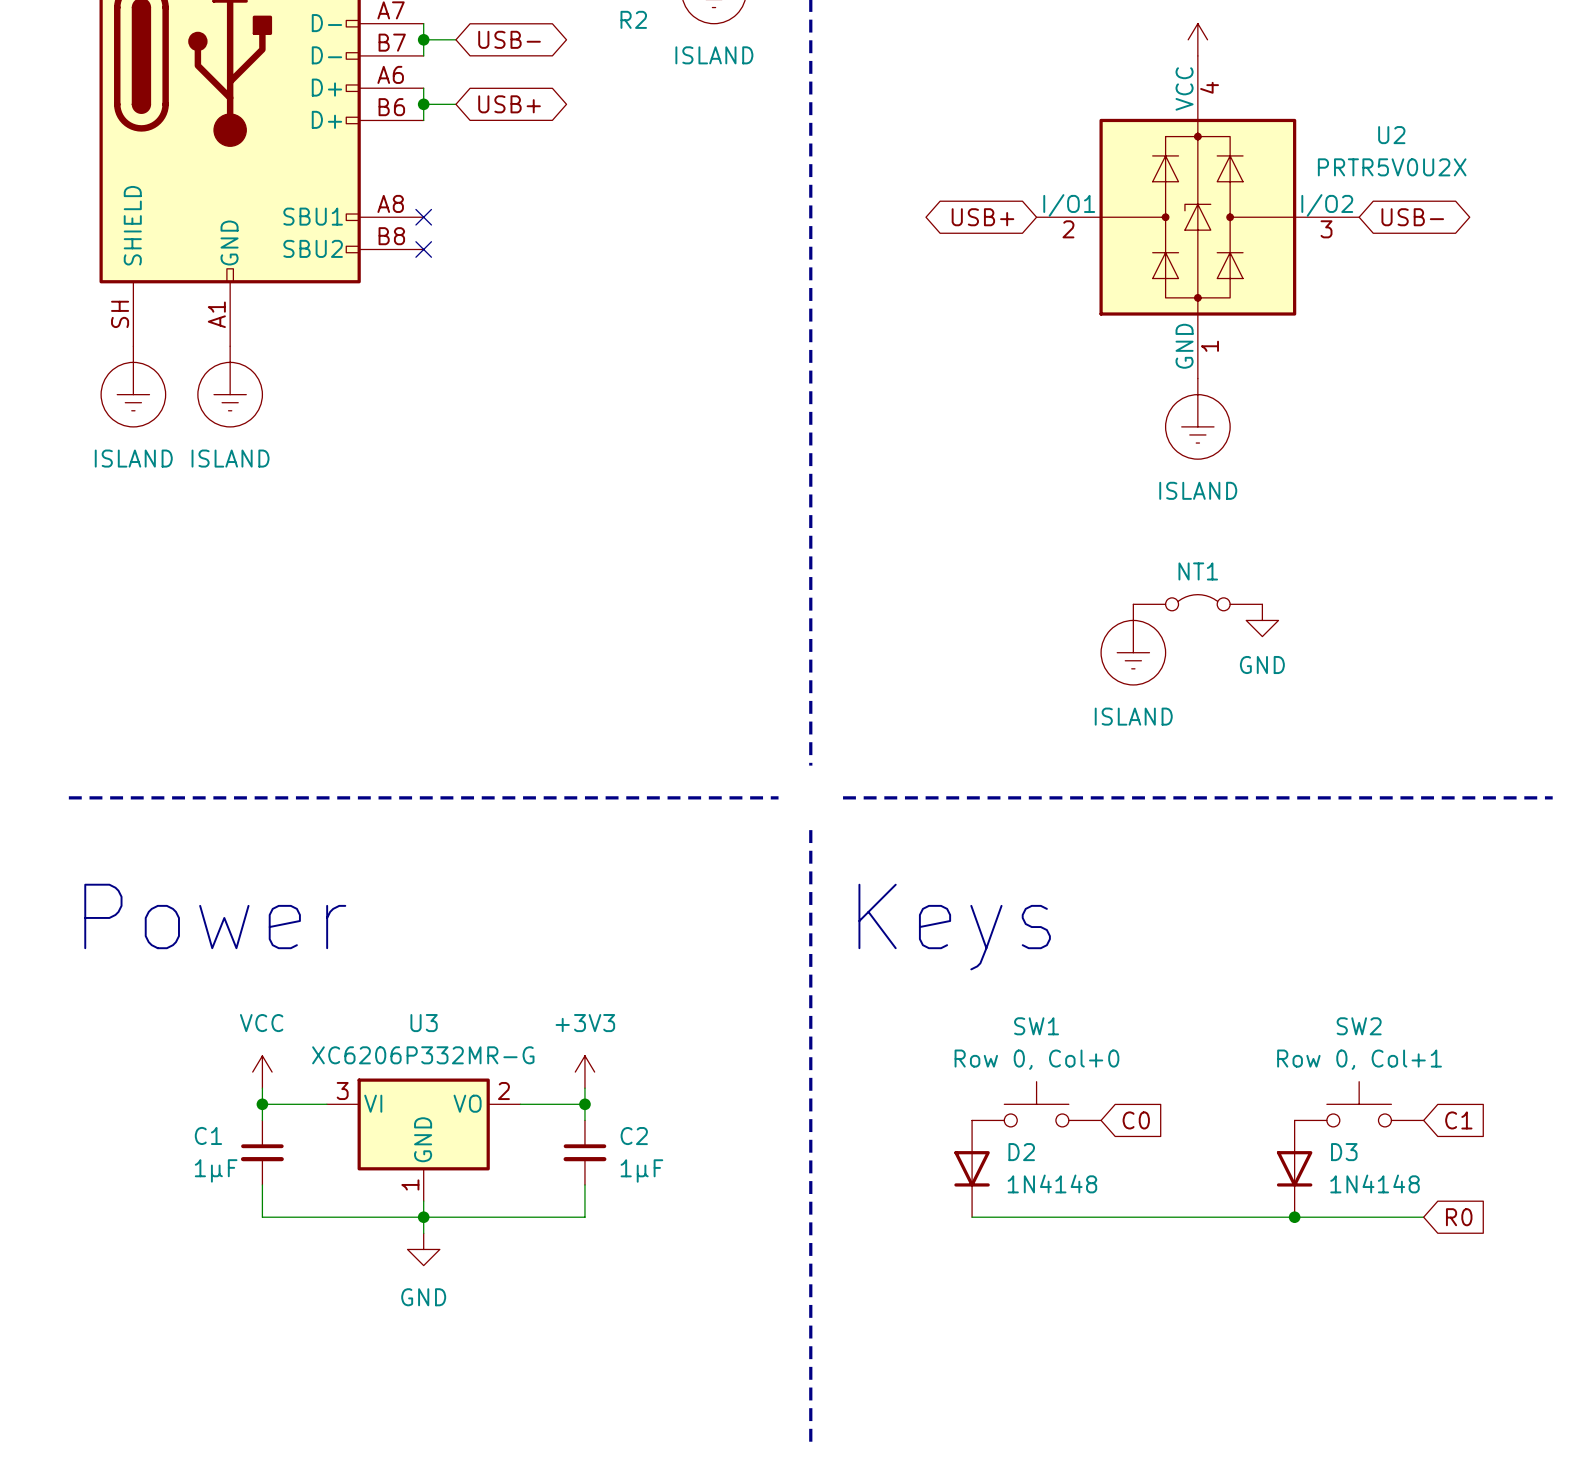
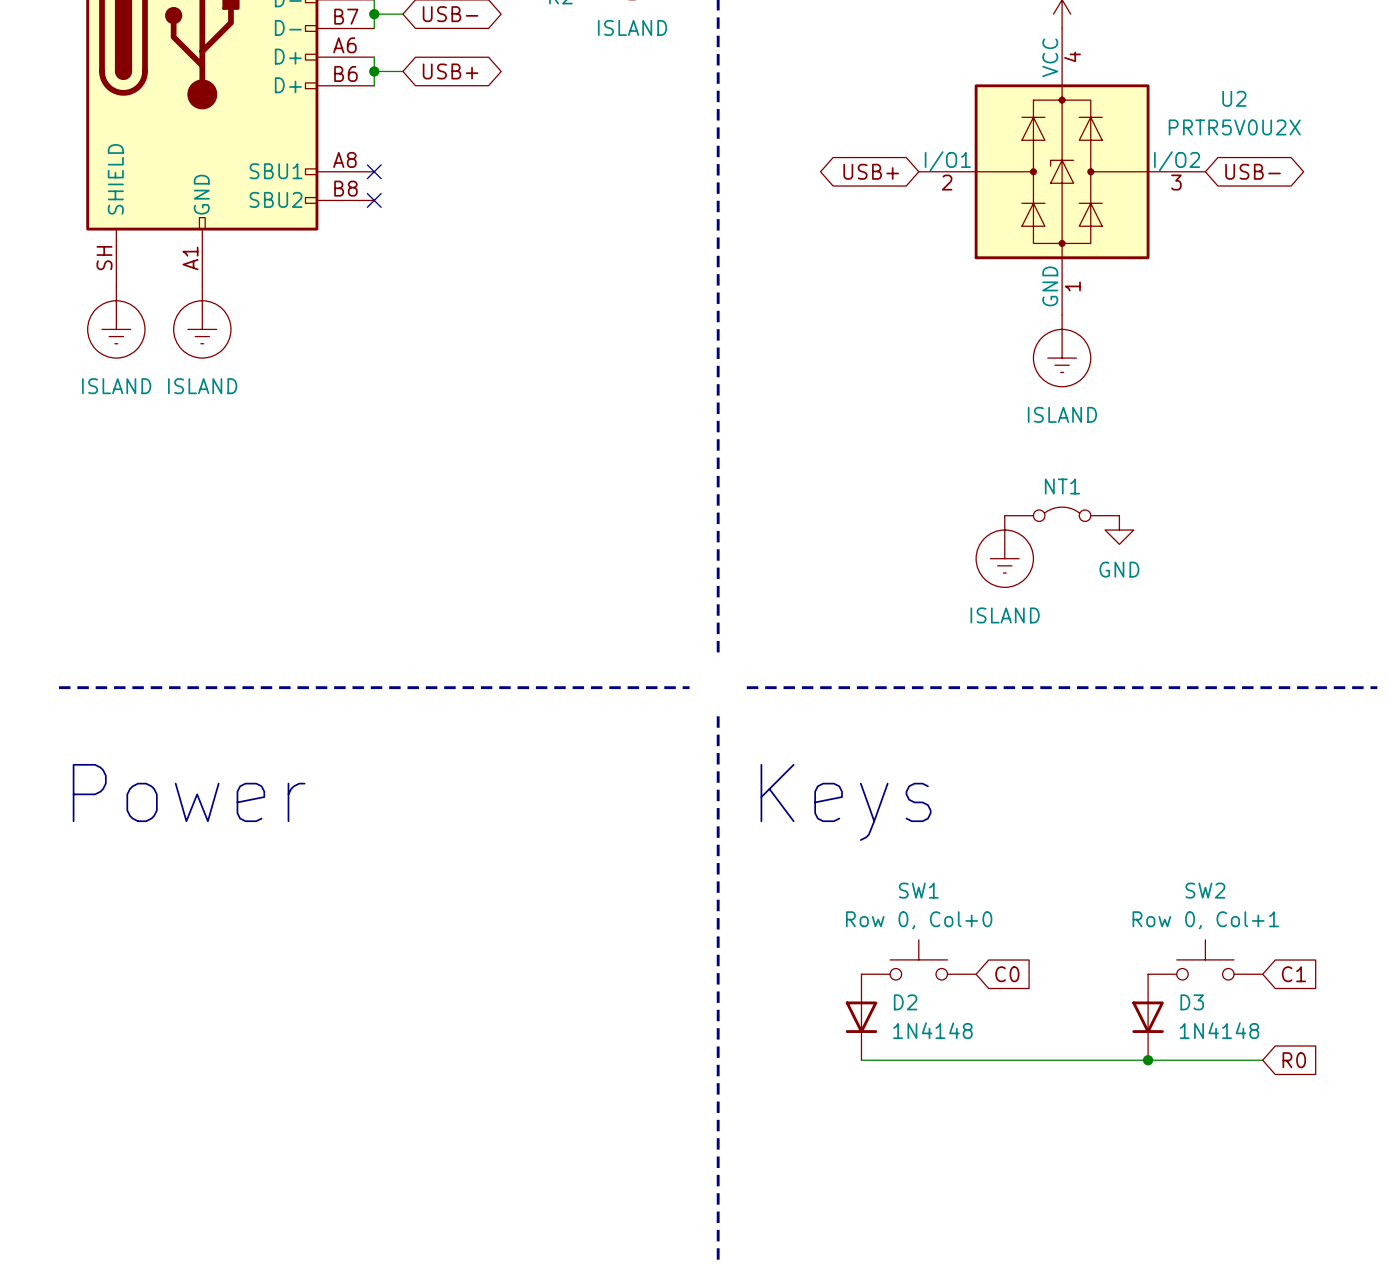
power symbol: VCC (262, 1072) -> none
power symbol: +3V3 (584, 1072) -> none
wire: (262, 1088) (262, 1120) -> none
wire: (584, 1088) (584, 1120) -> none
wire: (262, 1104) (326, 1104) -> none
junction: (262, 1104) -> none
wire: (520, 1104) (584, 1104) -> none
junction: (584, 1104) -> none
U3: XC6206P332MR-G (423, 1139) -> none
C1: 1µF (262, 1152) -> none
C2: 1µF (584, 1152) -> none
wire: (262, 1184) (262, 1217) (584, 1217) (584, 1184) -> none
wire: (423, 1201) (423, 1233) -> none
junction: (423, 1217) -> none
power symbol: GND (423, 1249) -> none

